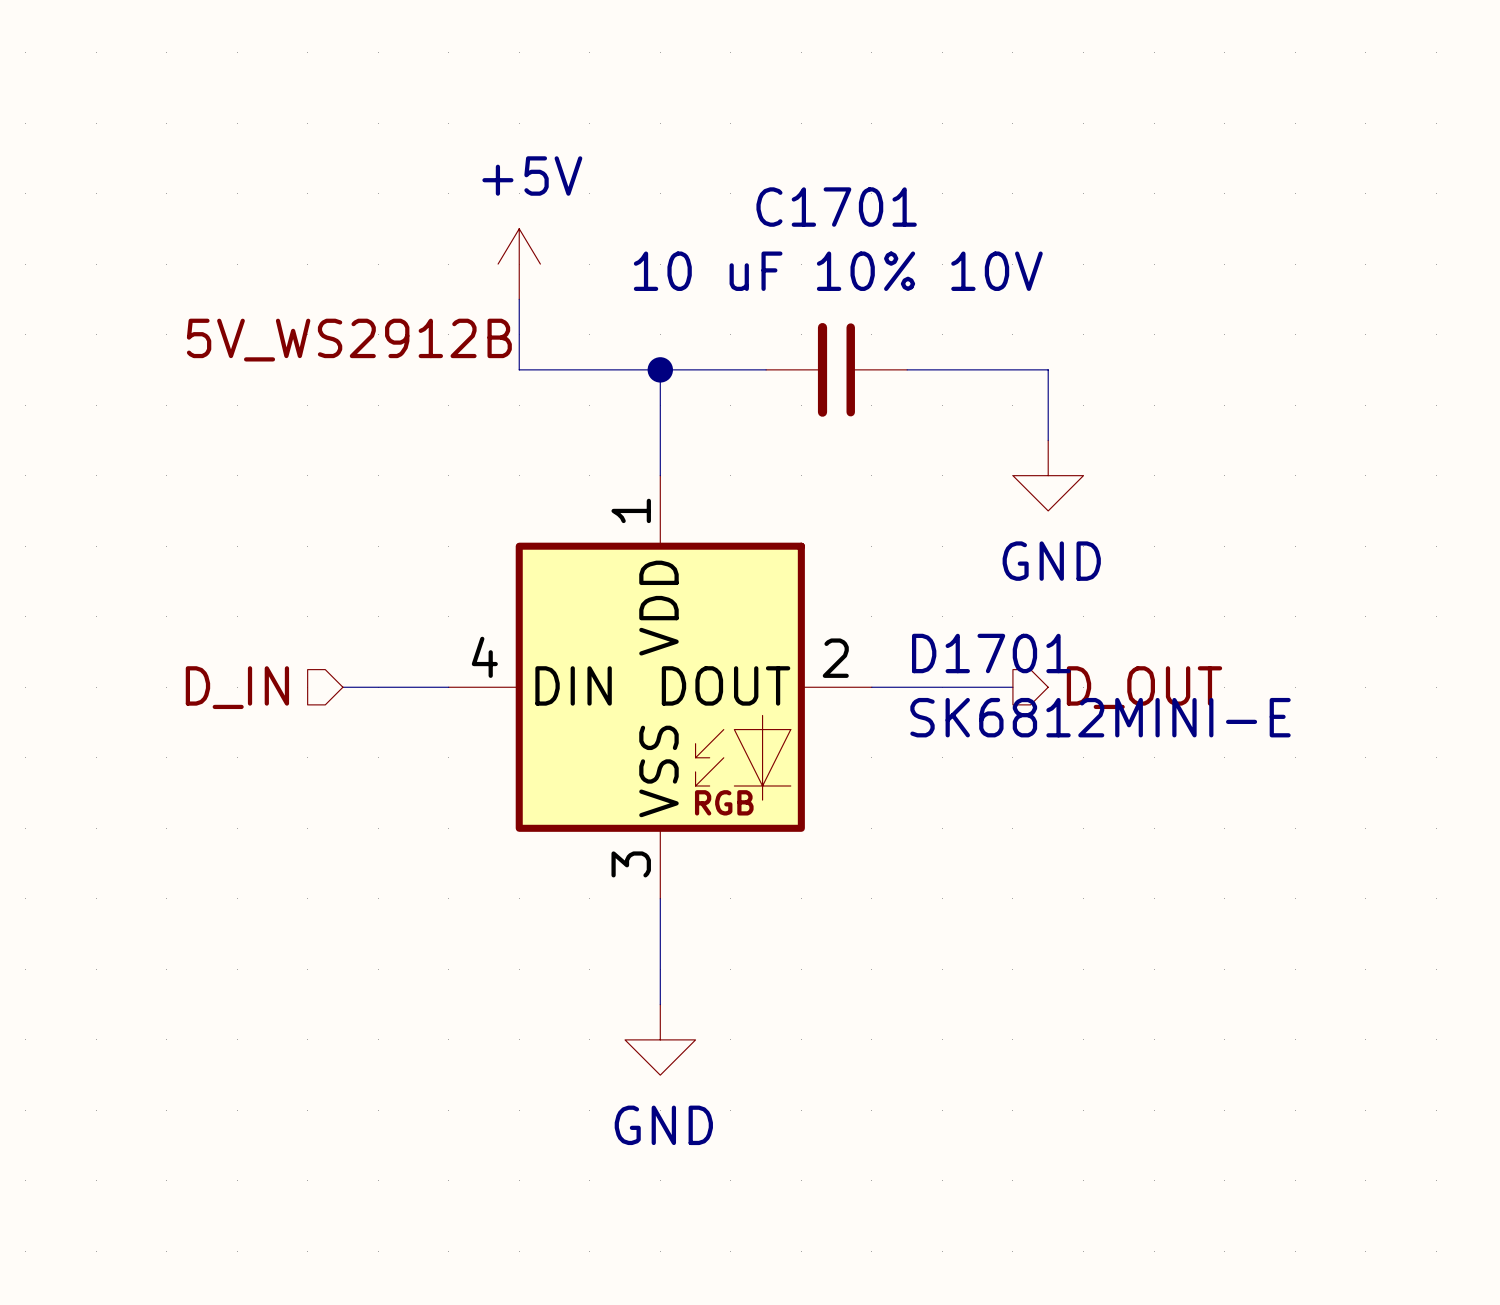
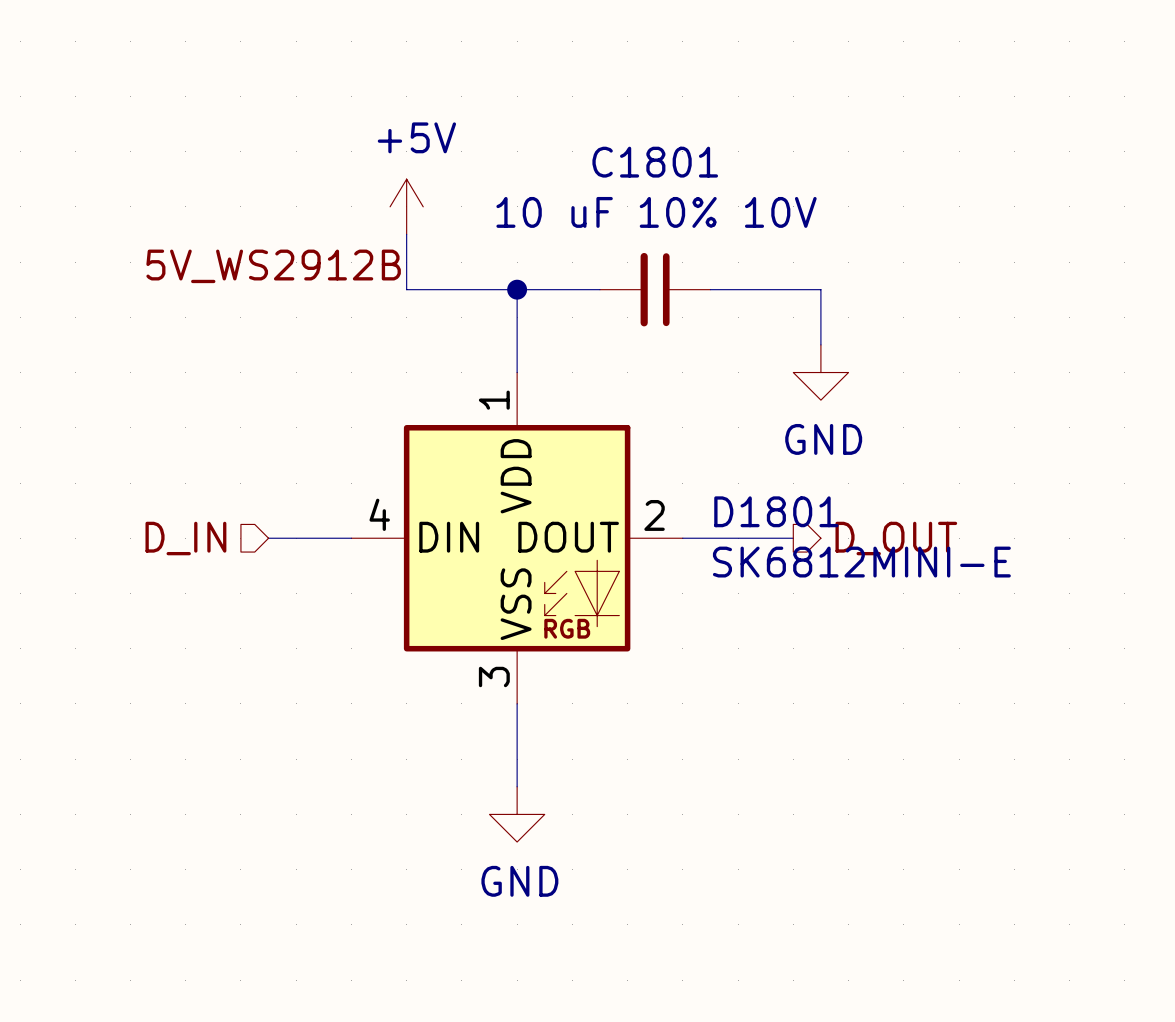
C1701 name: C1701 (836, 207) -> C1801 (655, 162)
D1701 name: D1701 (991, 653) -> D1801 (776, 511)

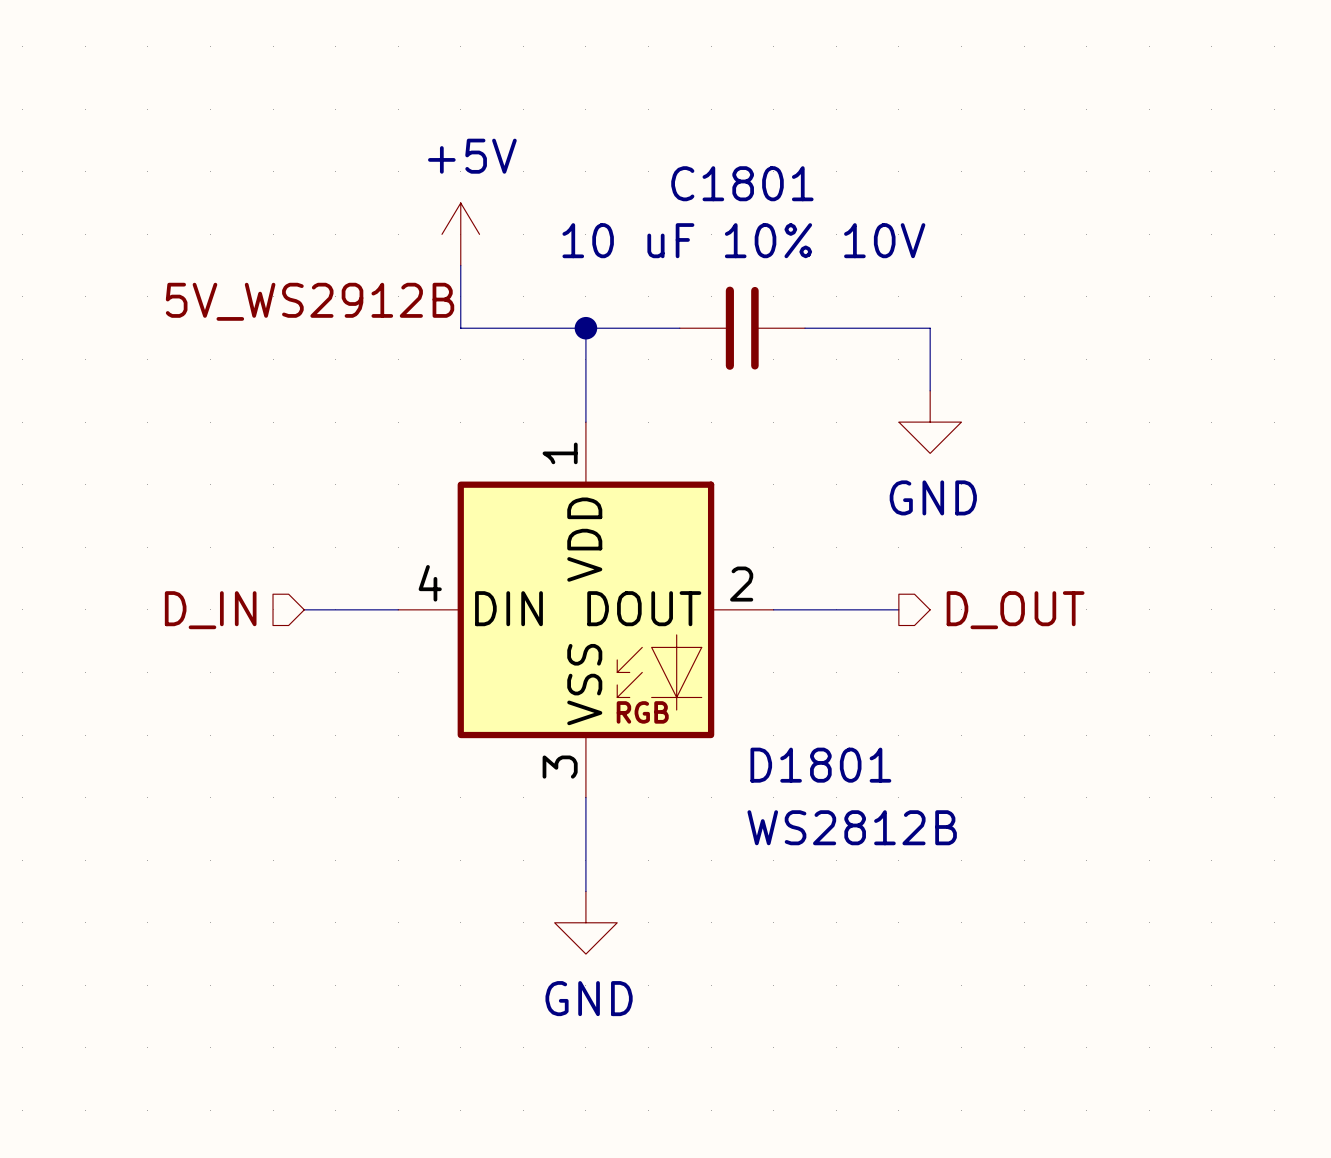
D1801 name position: D1801 (776, 511) -> D1801 (820, 765)
D1801 value: SK6812MINI-E (861, 562) -> WS2812B (852, 827)

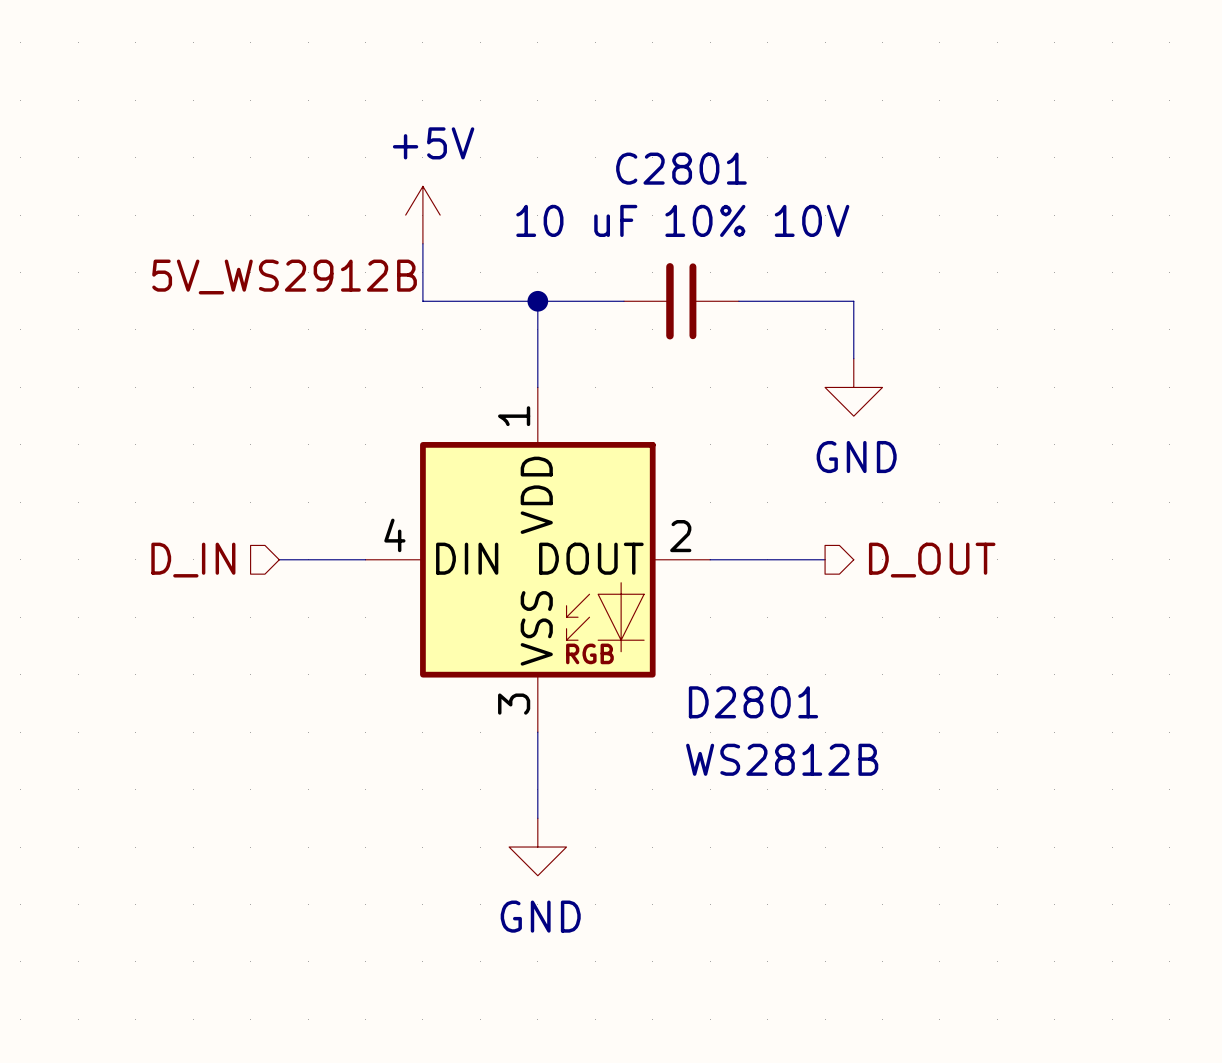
C1801 name: C1801 (742, 183) -> C2801 (681, 168)
D1801 name: D1801 (820, 765) -> D2801 (753, 702)

